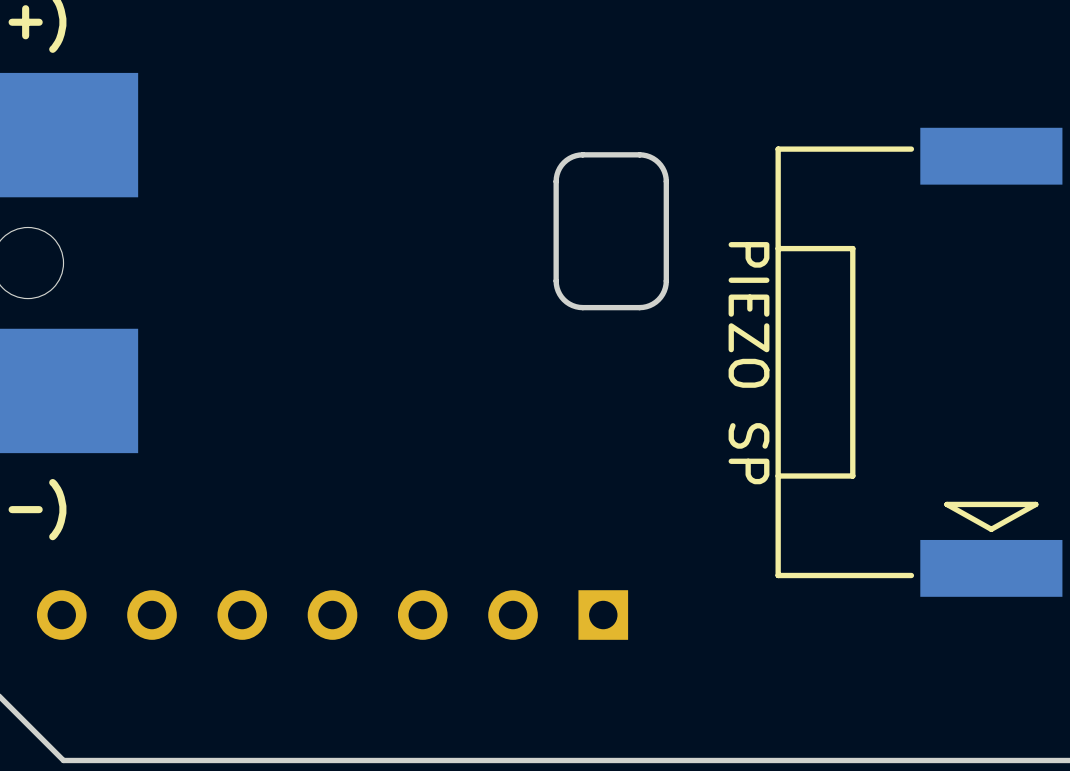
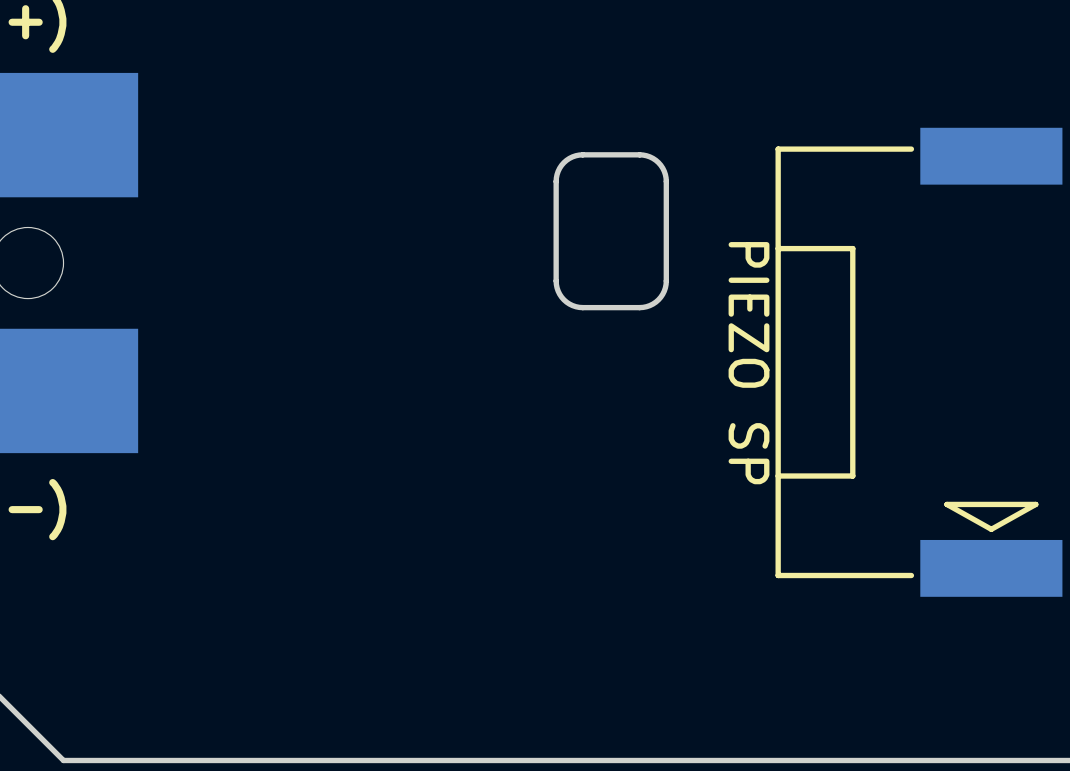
part: (332, 615) -> none

